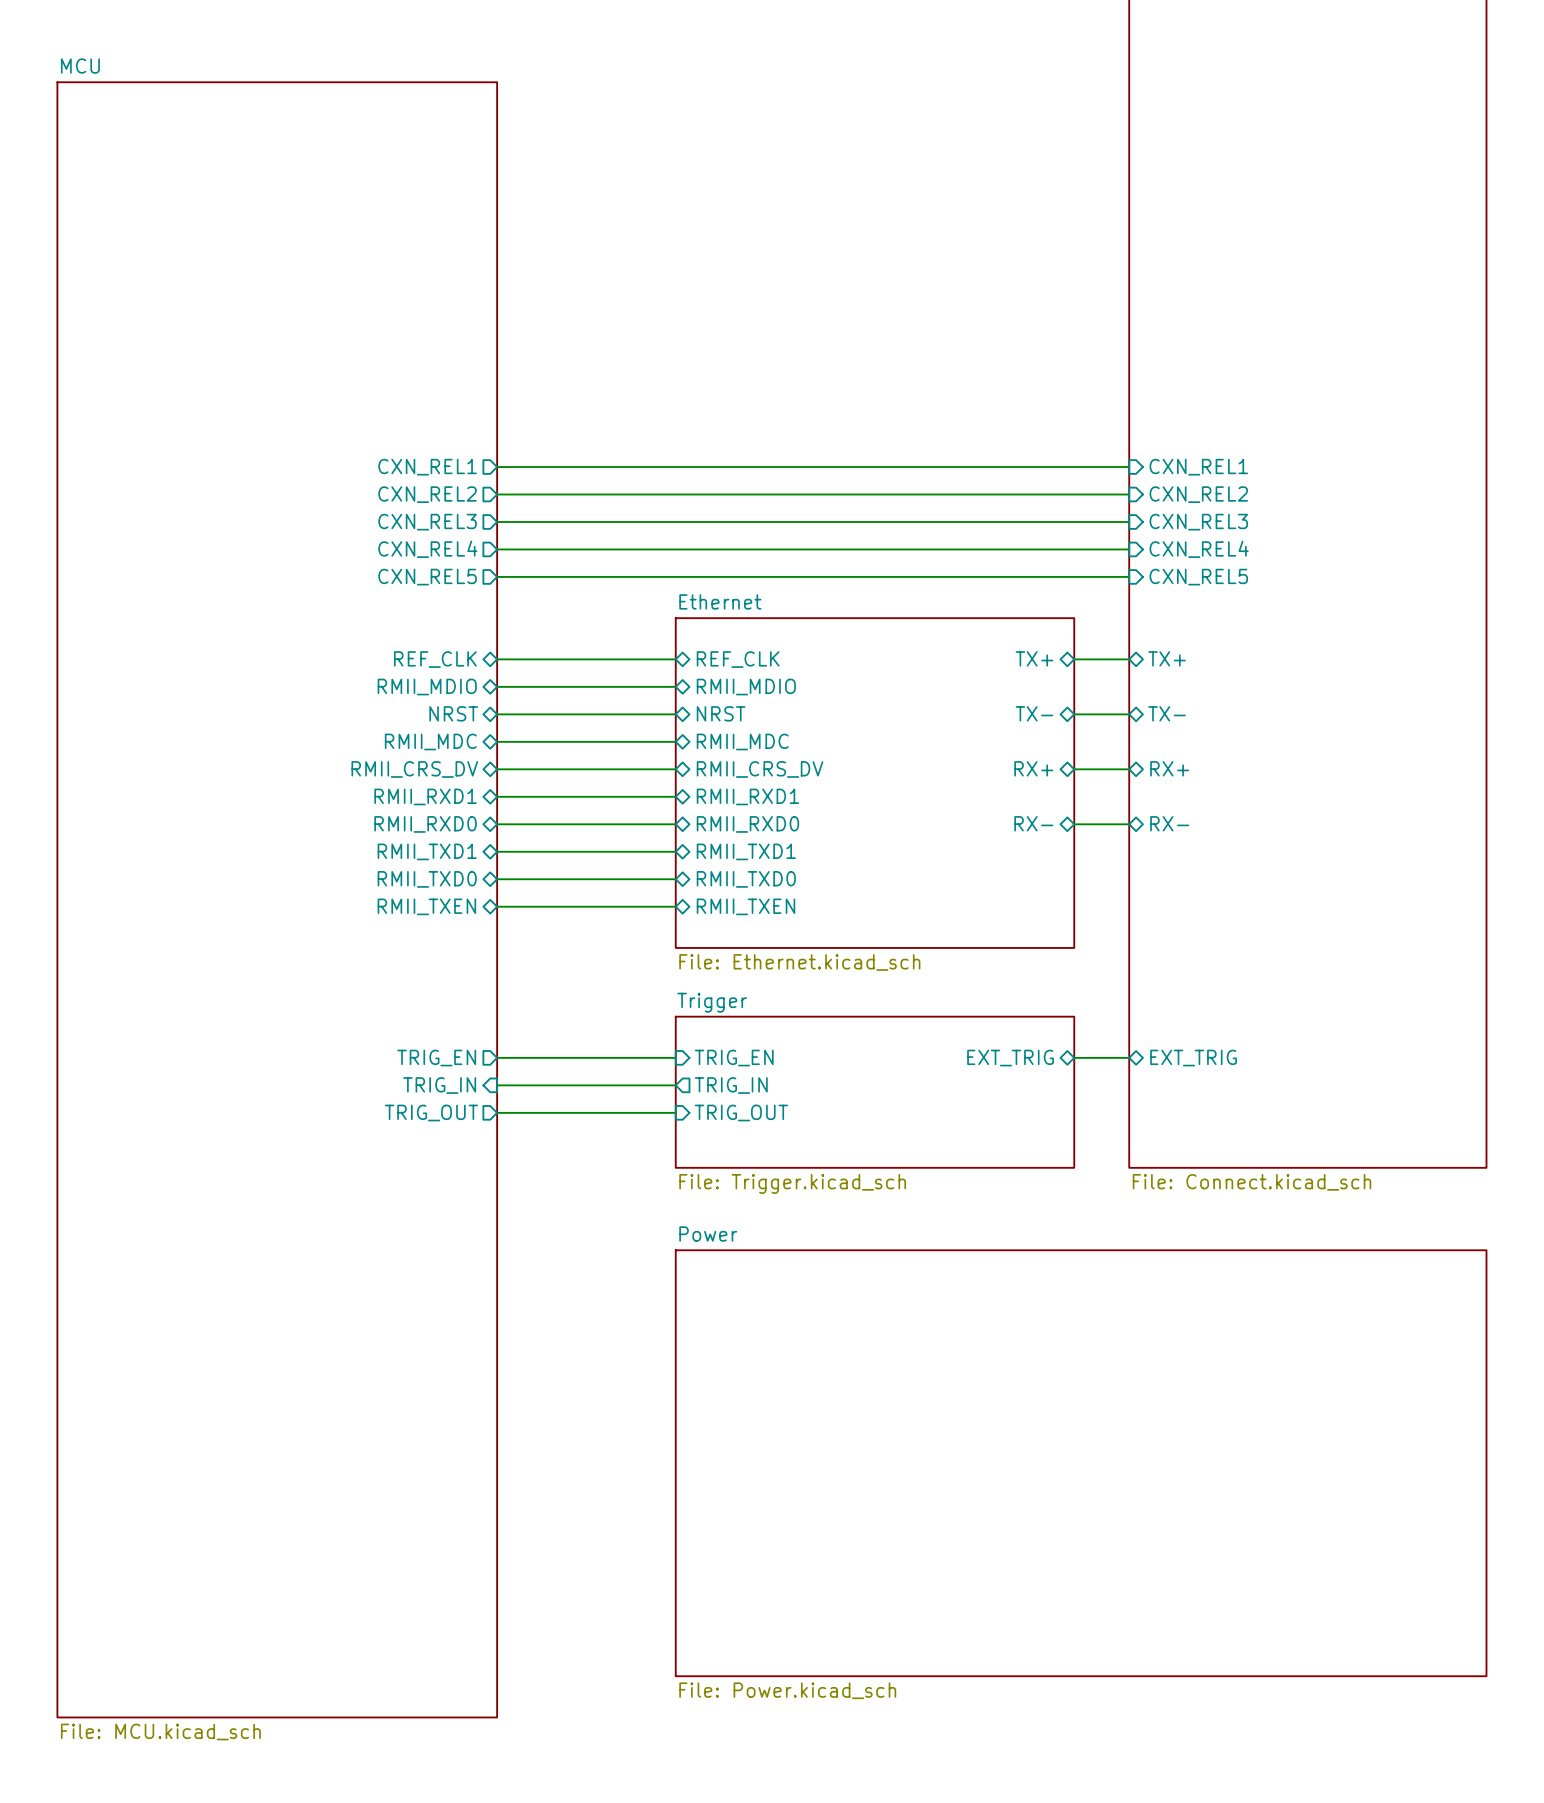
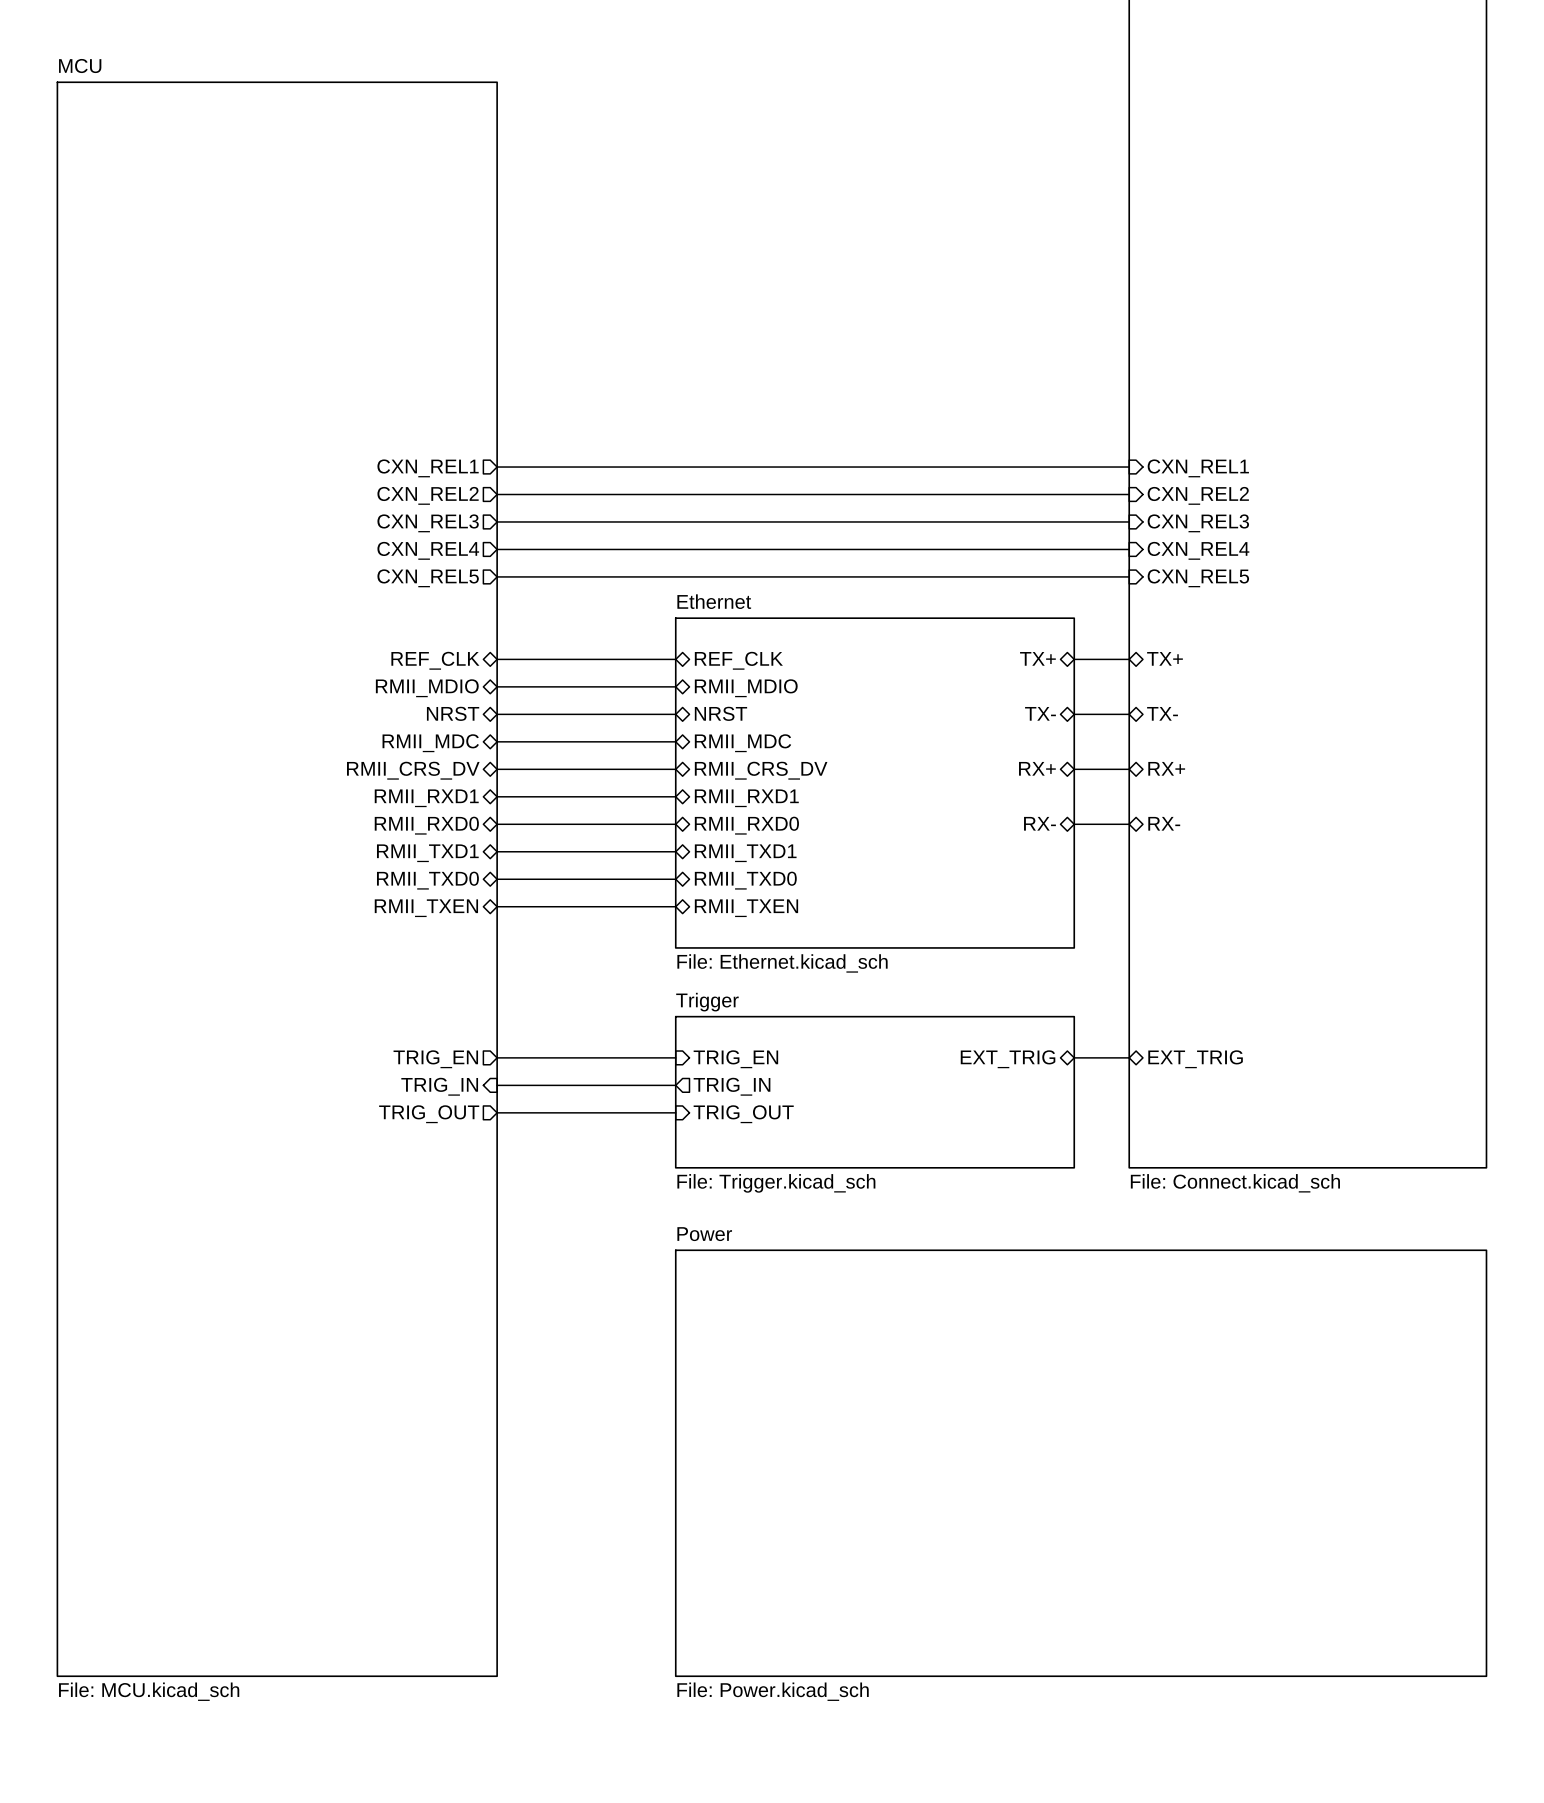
sheet MCU: none -> File: MCU.kicad_sch (277, 879)
sheet MCU: File: MCU.kicad_sch (277, 899) -> none

